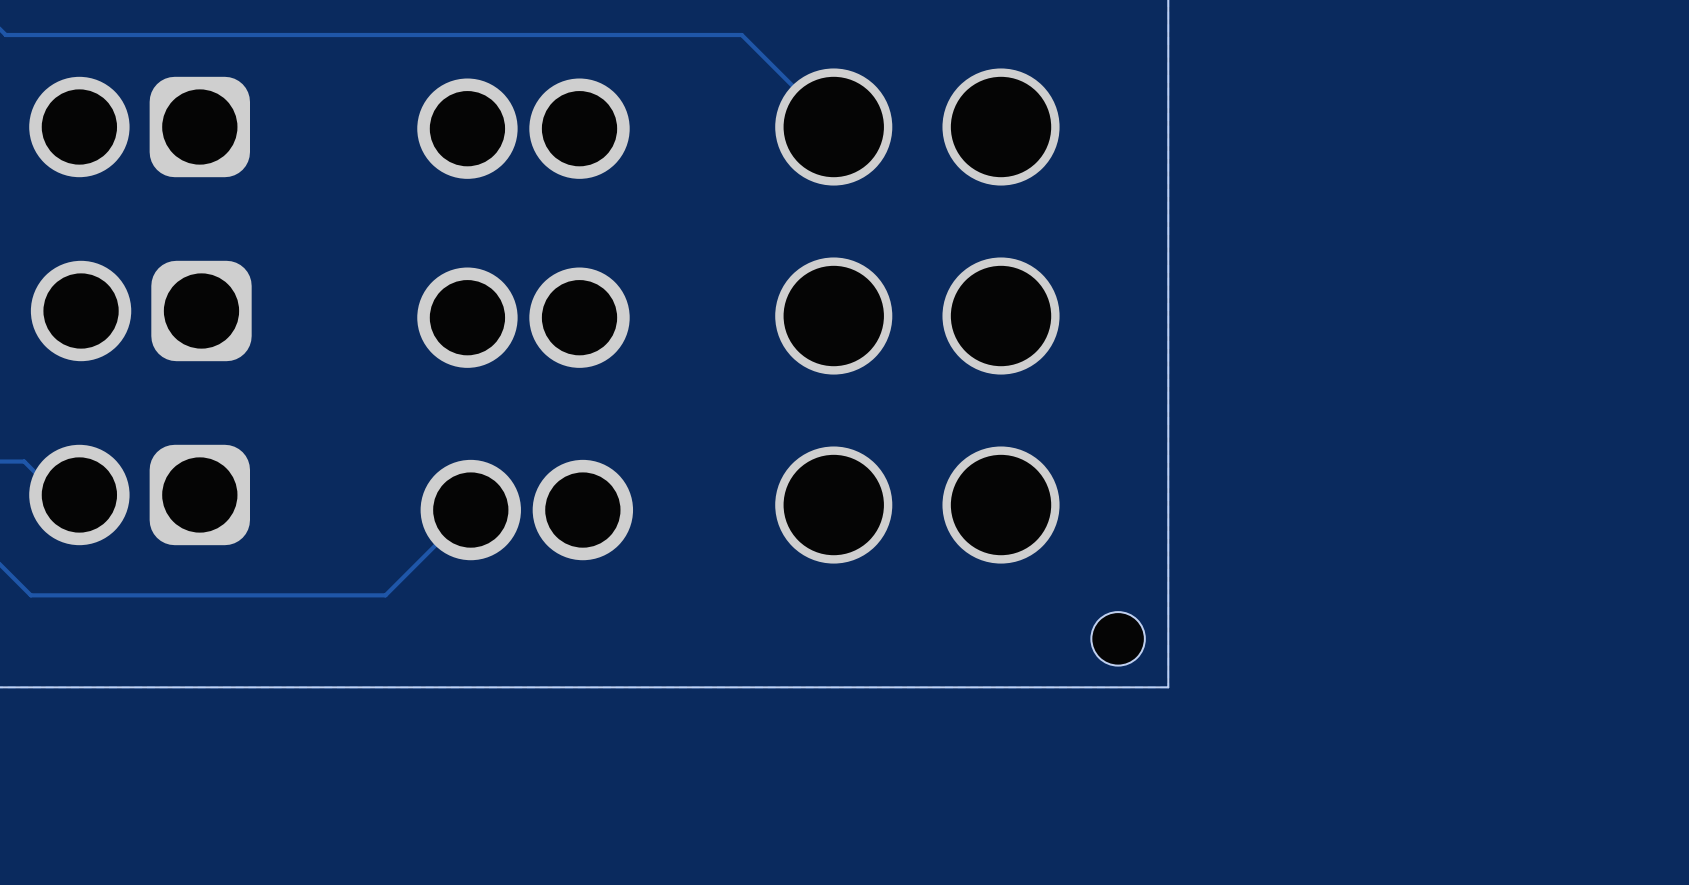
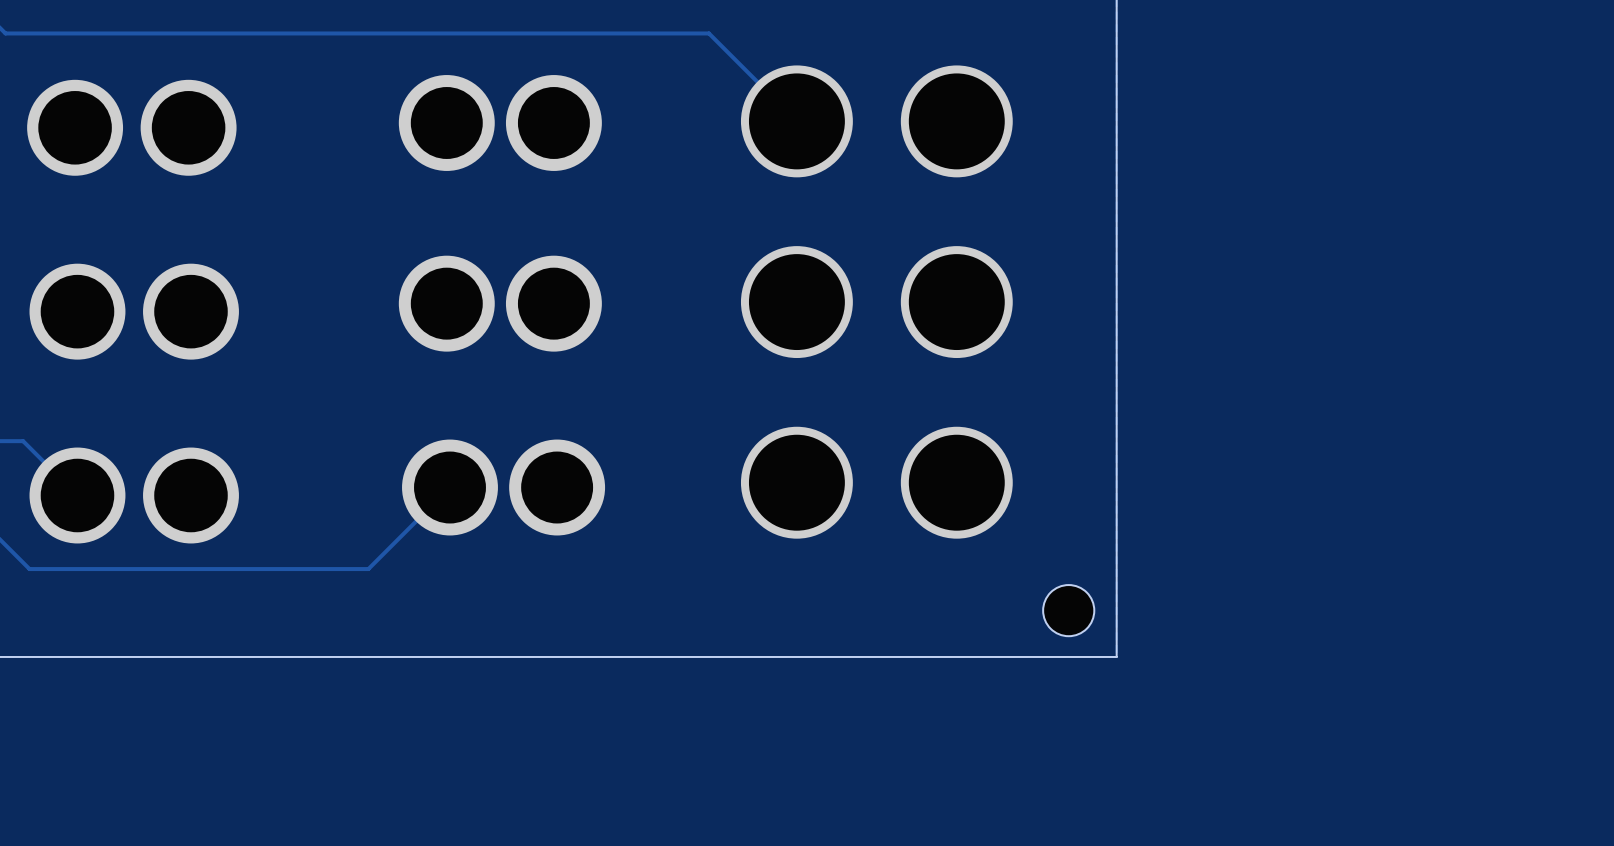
part footprint: [29, 76, 251, 178] -> [27, 79, 237, 176]
part footprint: [30, 260, 252, 362] -> [29, 263, 239, 360]
part: (139, 494) -> none
part: none -> (134, 495)

